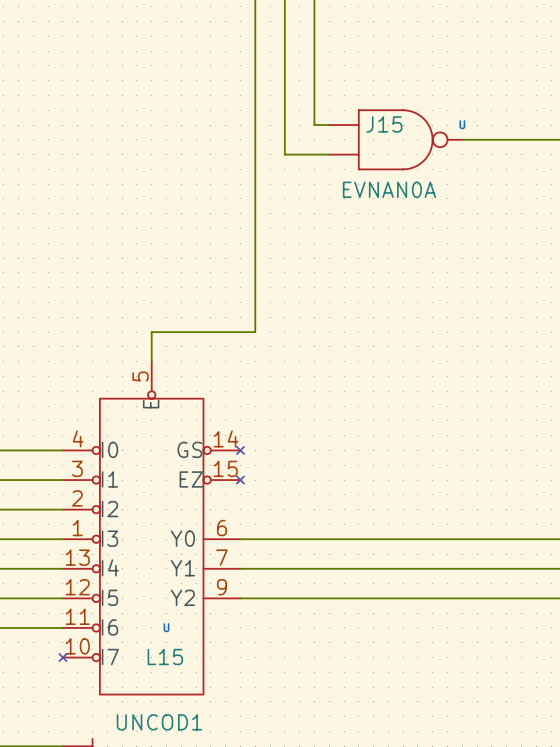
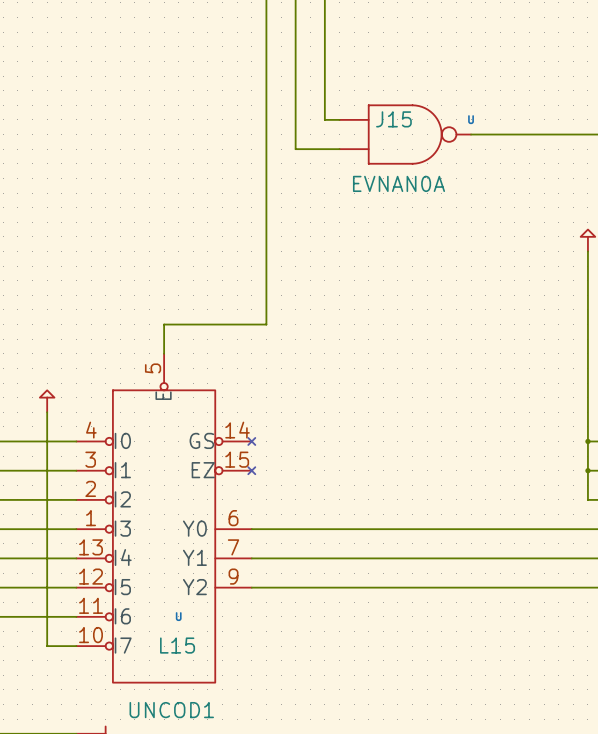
power symbol: none -> (47, 401)
wire: none -> (47, 412) (47, 646) (76, 646)
no-connect mark: (62, 657) -> none

